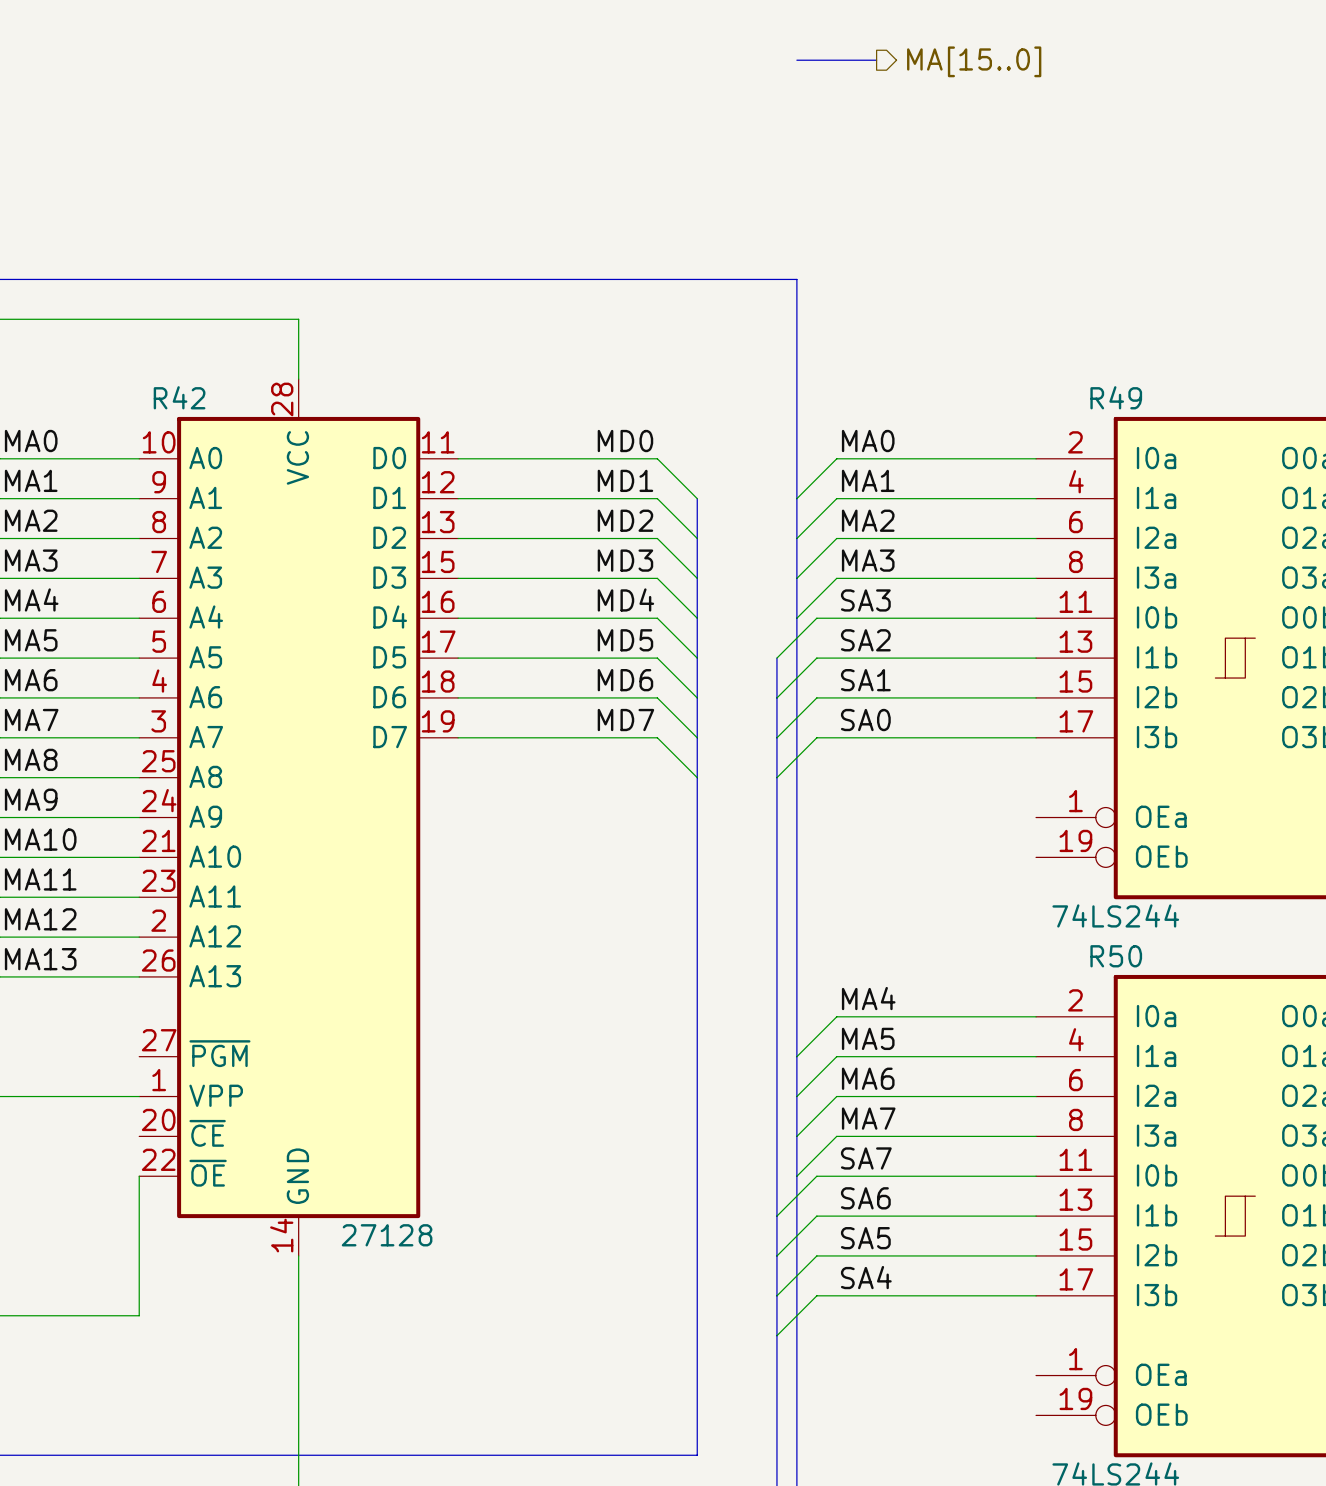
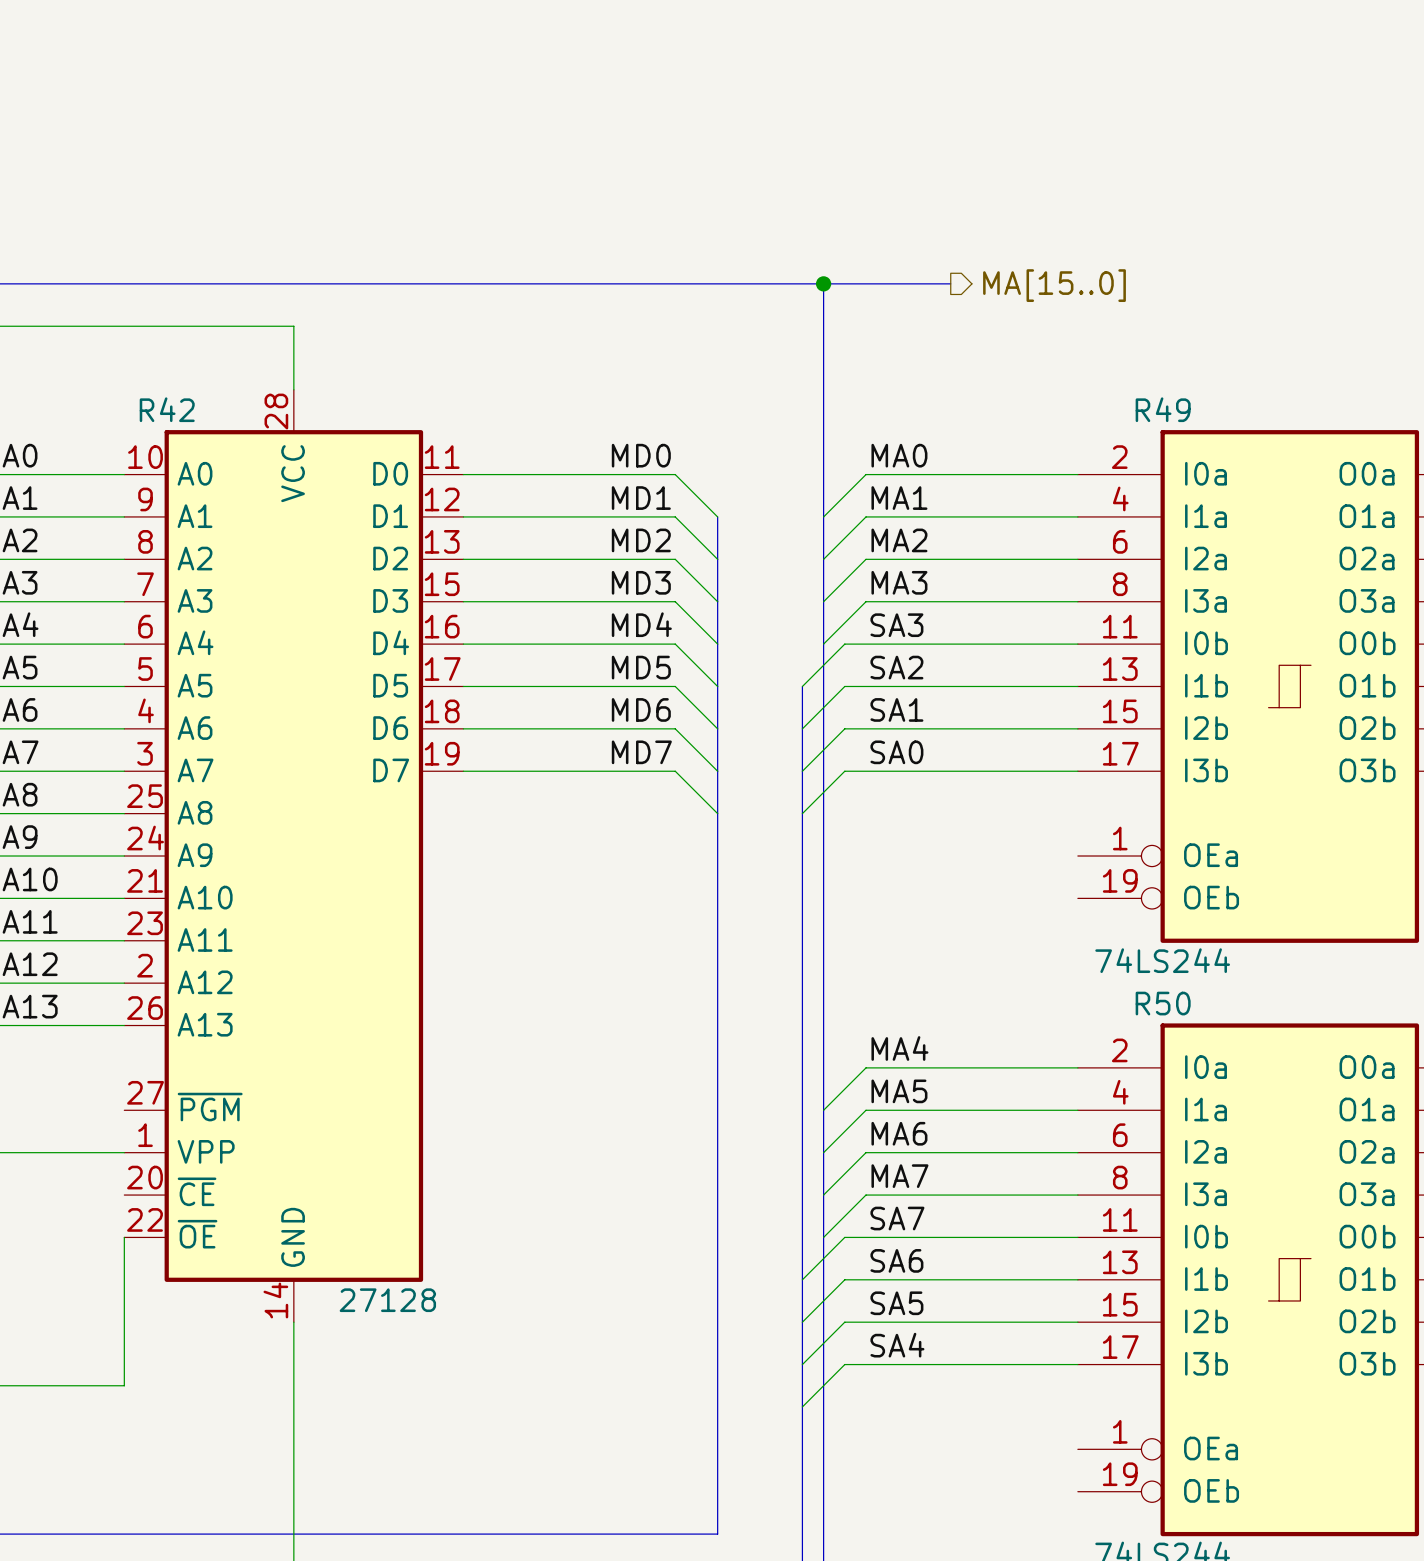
bus: (796, 60) (876, 60) -> none
hierarchical label position: MA[15..0] (974, 61) -> MA[15..0] (1054, 285)
bus: none -> (823, 283) (950, 283)
junction: none -> (823, 283)

